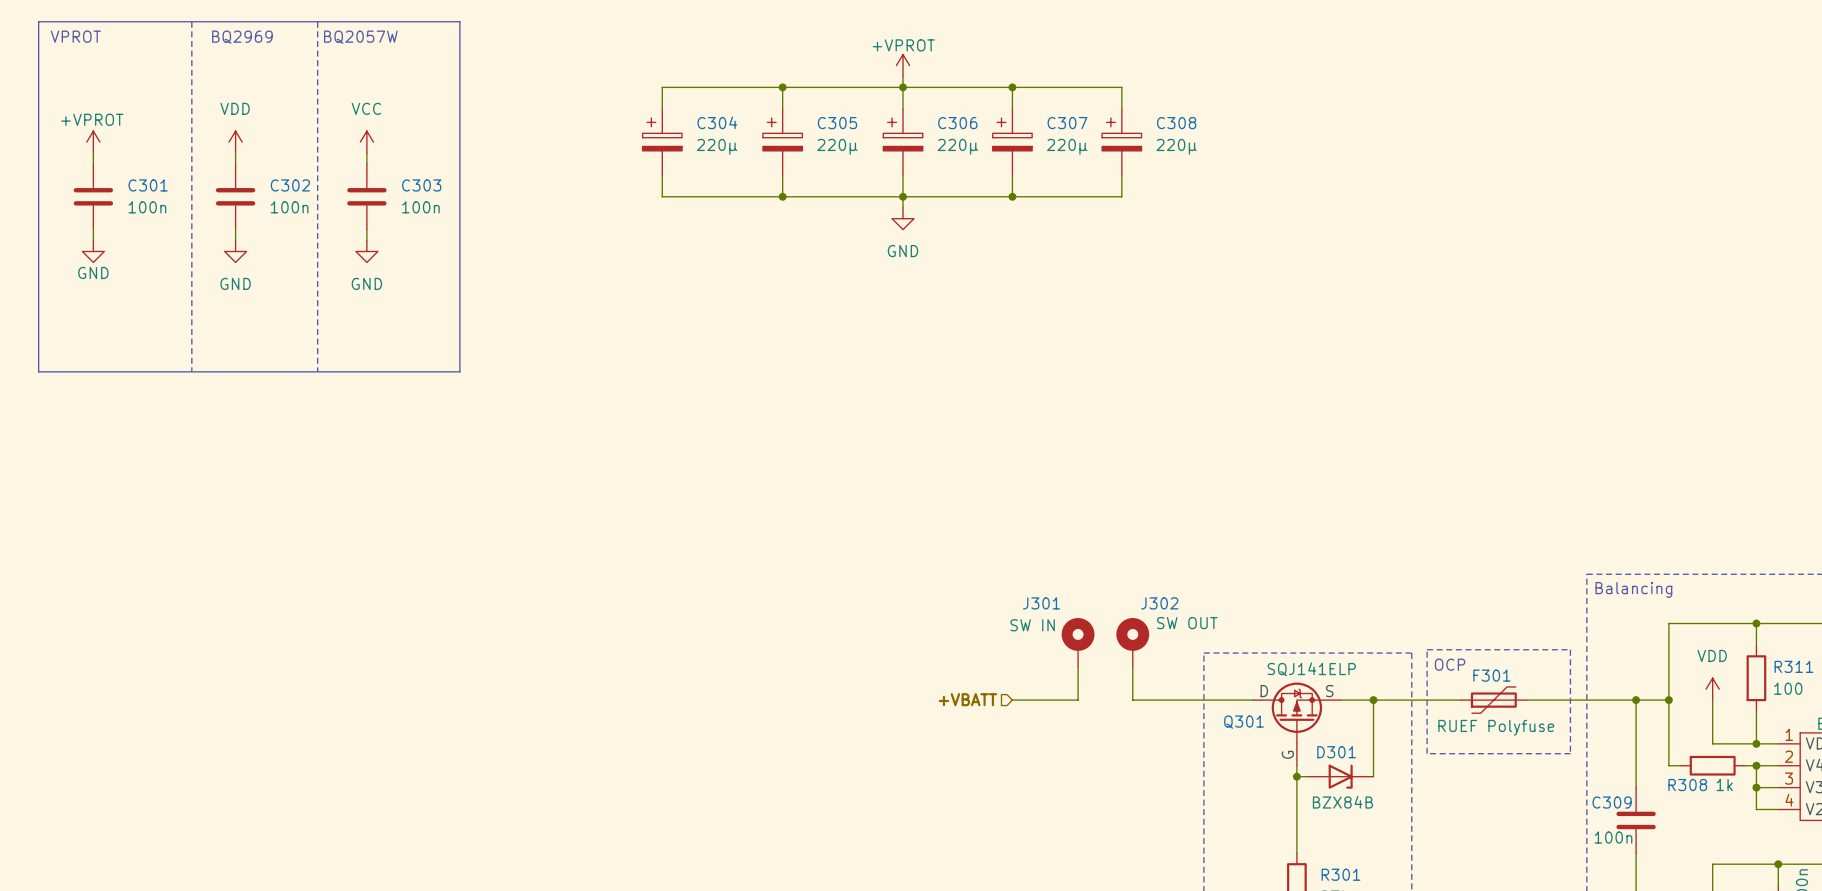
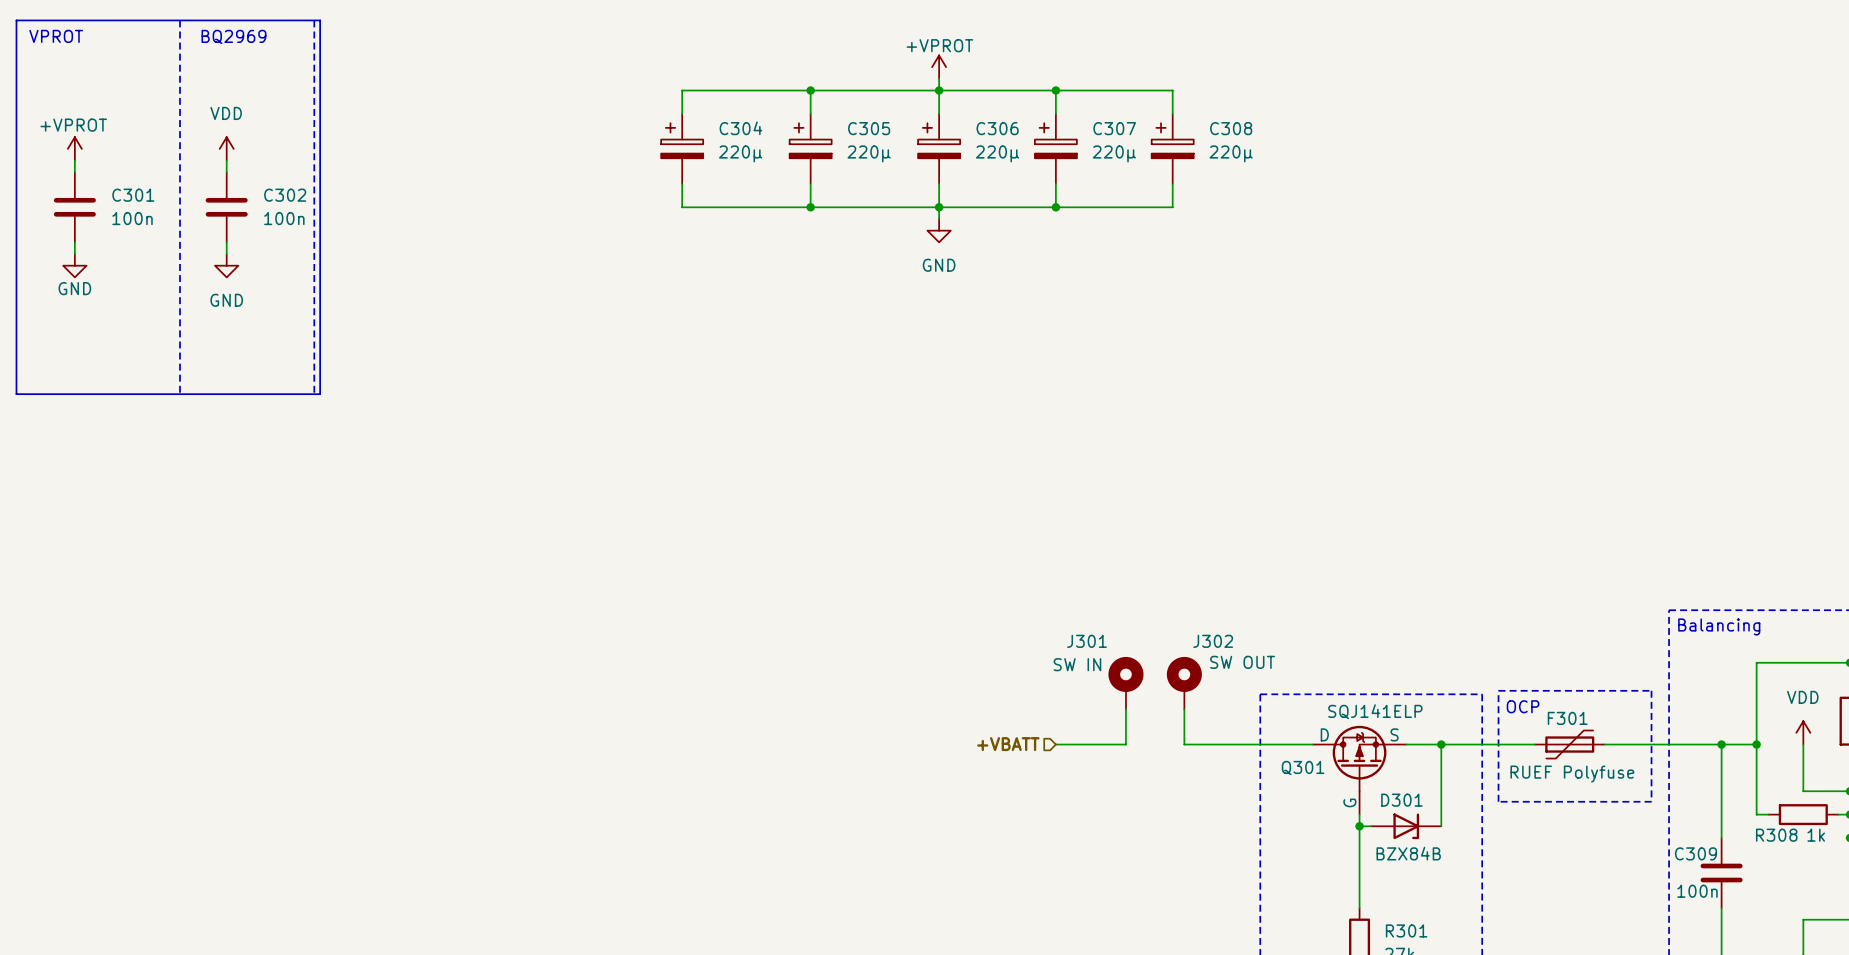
line: (323, 21) (459, 21) (459, 371) (323, 371) -> (320, 20) (320, 394)
text: BQ2057W (360, 37) -> none
power symbol: VCC (366, 142) -> none
wire: (366, 153) (366, 163) -> none
C303: 100n (366, 196) -> none
wire: (366, 229) (366, 240) -> none
power symbol: GND (366, 251) -> none

